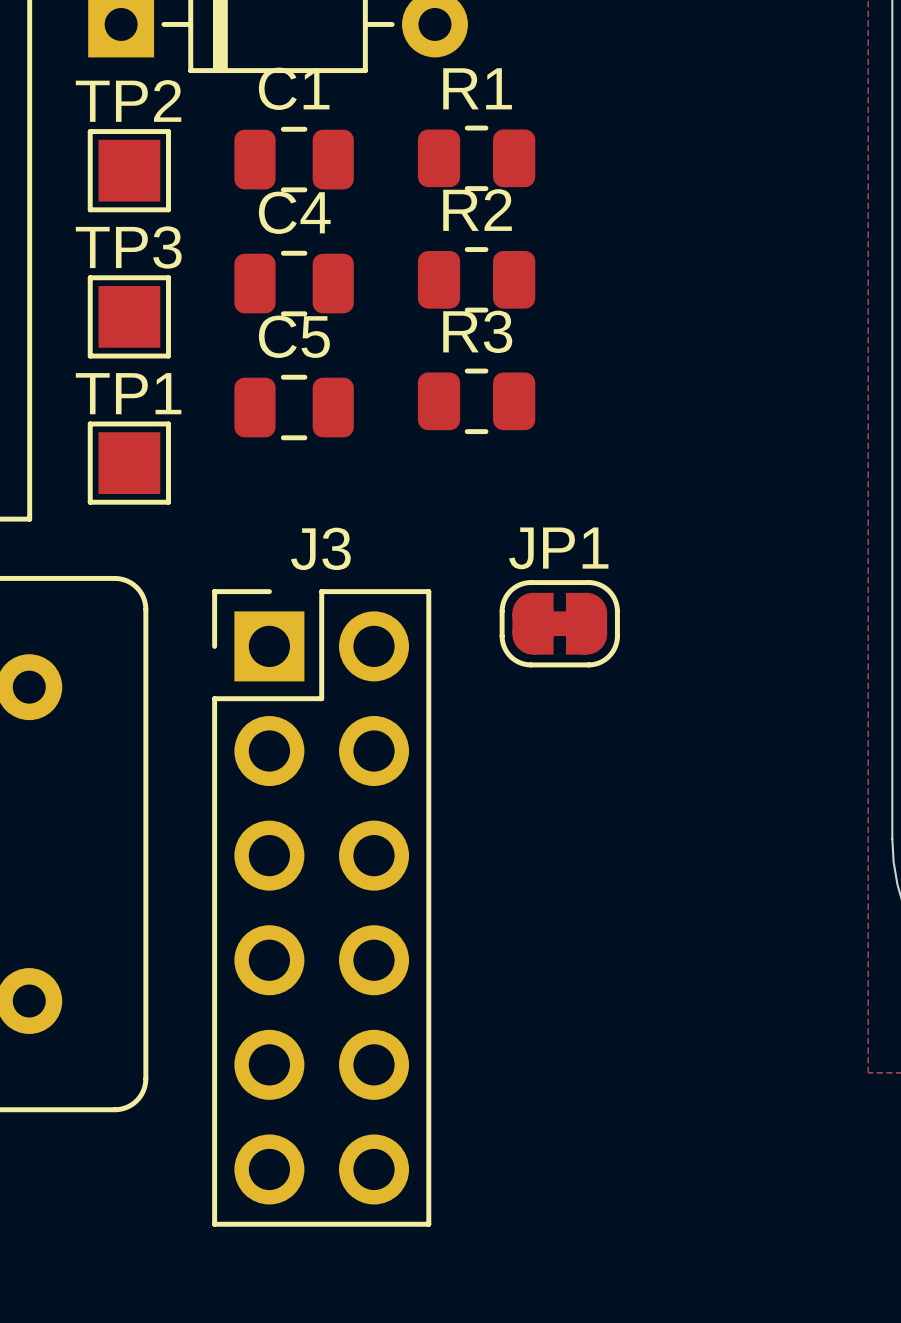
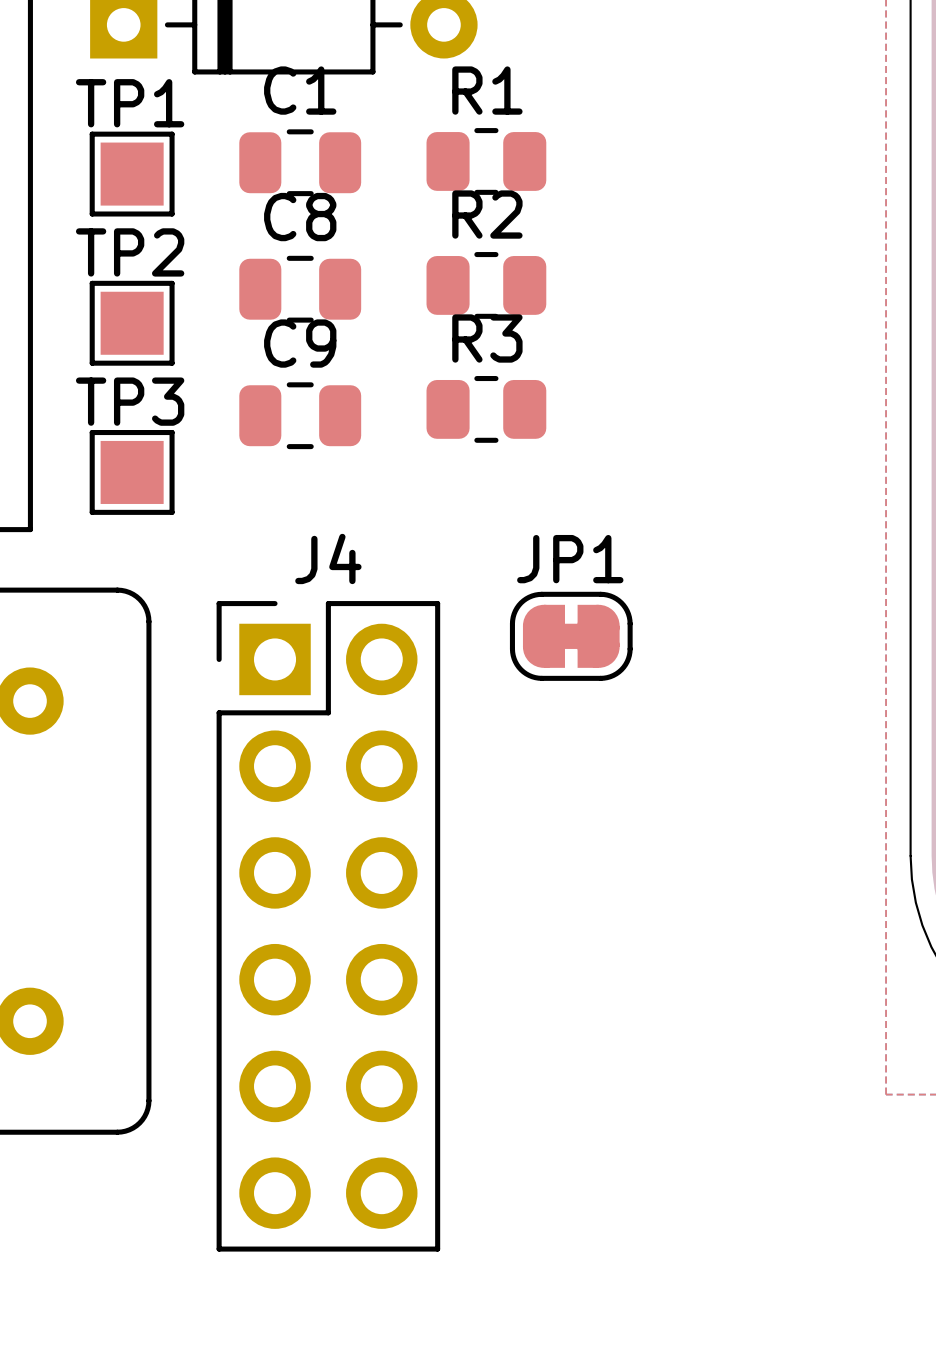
TP2 name: TP2 (128, 100) -> TP1 (130, 103)
C4 name: C4 (294, 212) -> C8 (300, 217)
TP3 name: TP3 (128, 247) -> TP2 (130, 252)
C5 name: C5 (294, 336) -> C9 (300, 343)
TP1 name: TP1 (128, 393) -> TP3 (130, 401)
J3 name: J3 (320, 548) -> J4 (328, 558)

